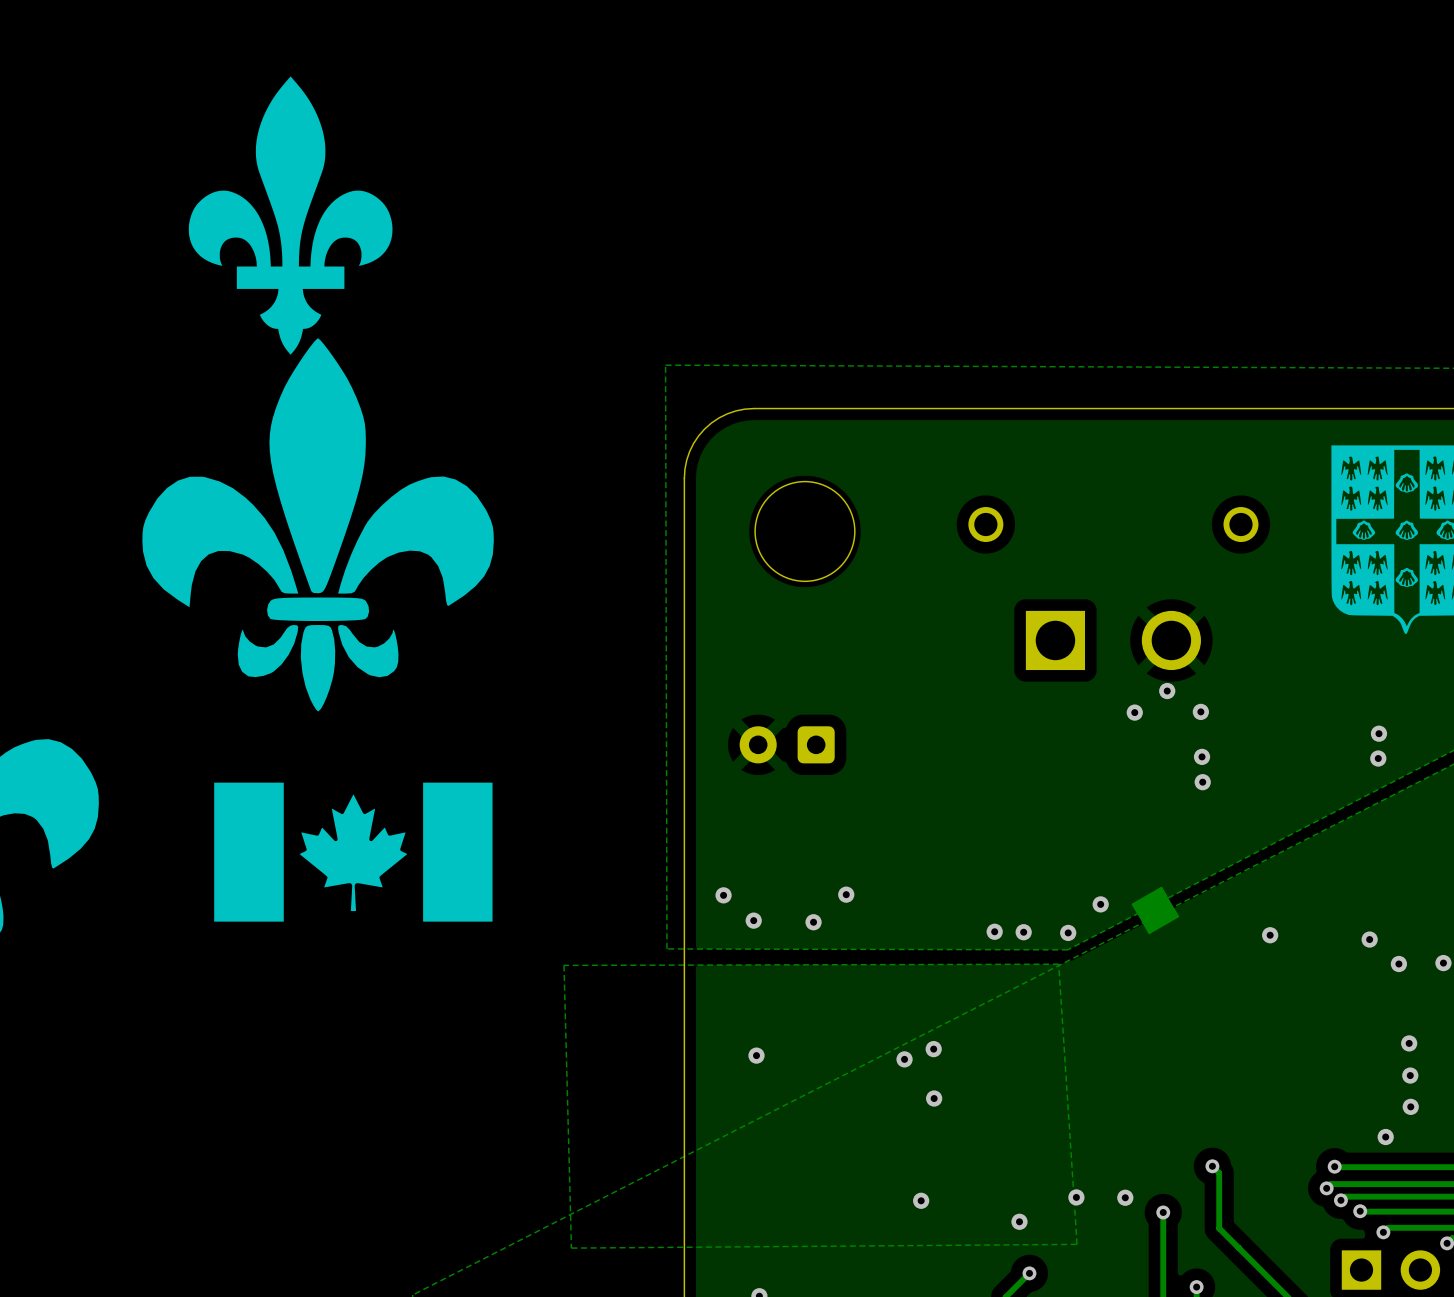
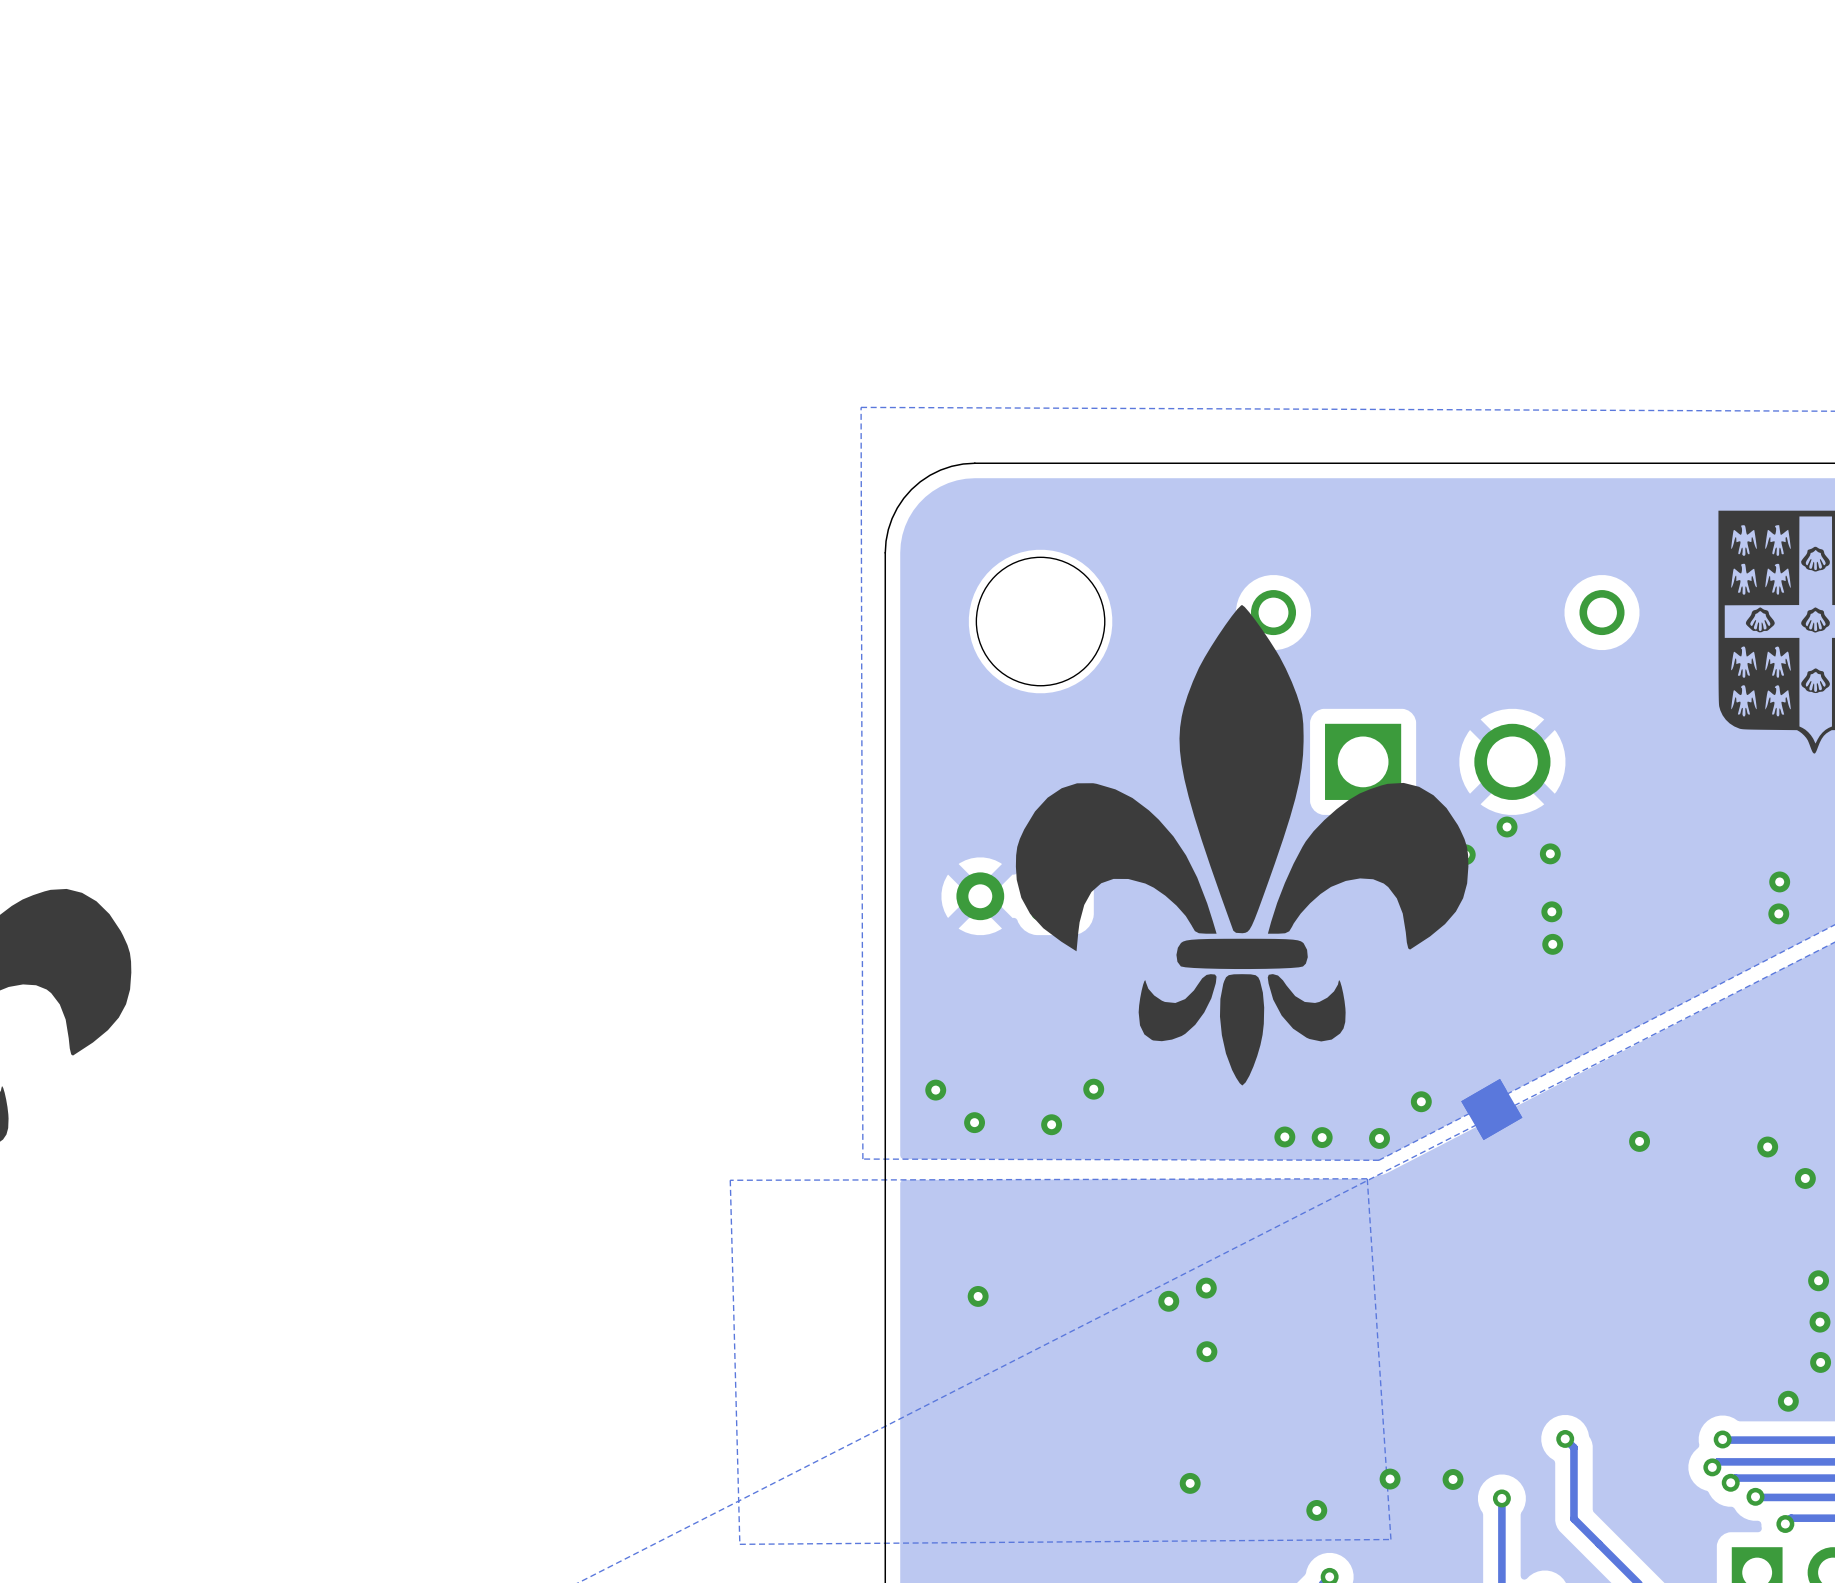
drawing: [142, 76, 494, 712] -> none
drawing: none -> [1015, 605, 1469, 1086]
drawing: [214, 782, 493, 922] -> none

